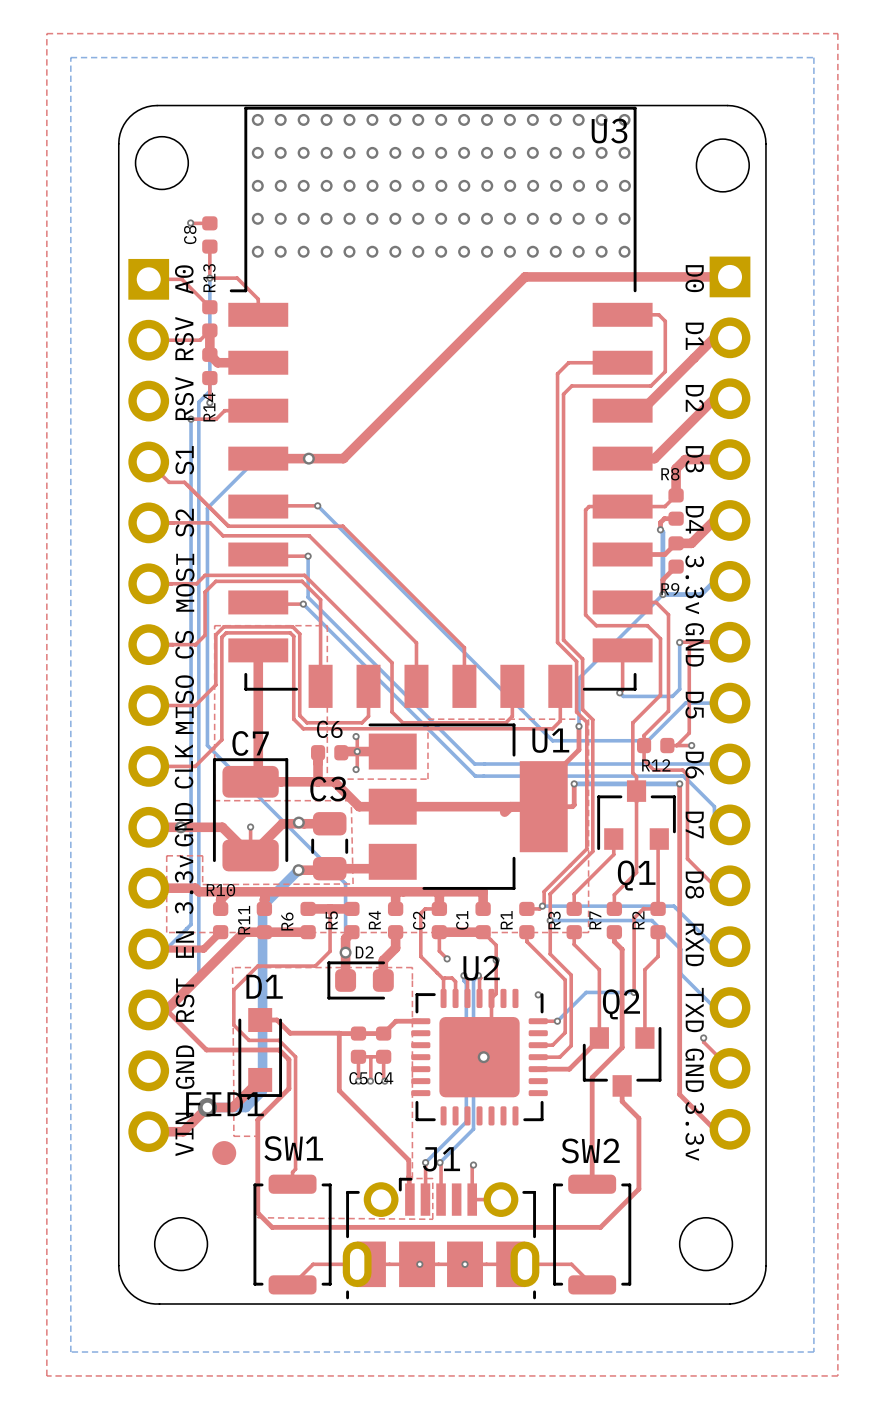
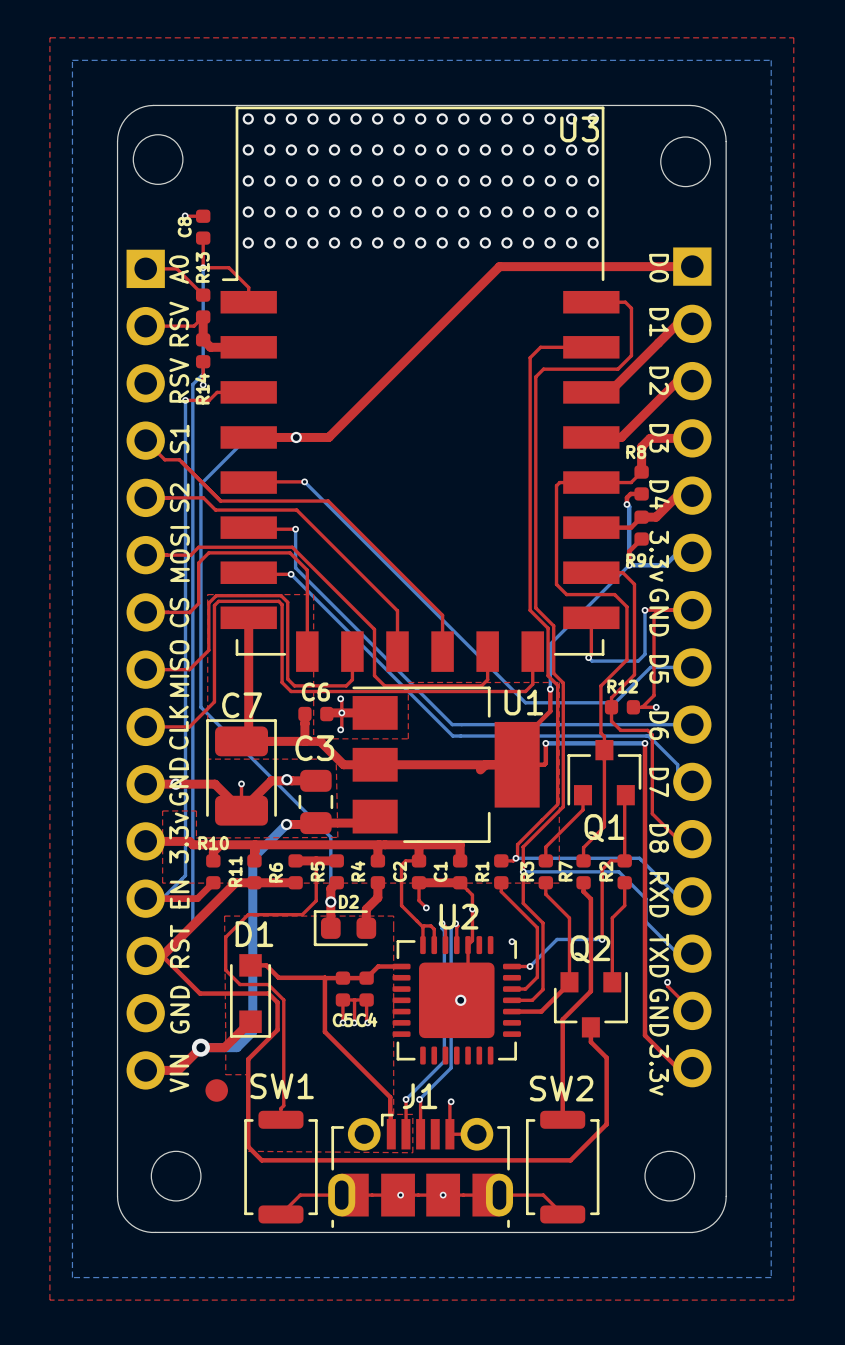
R12 name position: R12 (656, 765) -> R12 (622, 686)
FID1 name: FID1 (224, 1104) -> none

